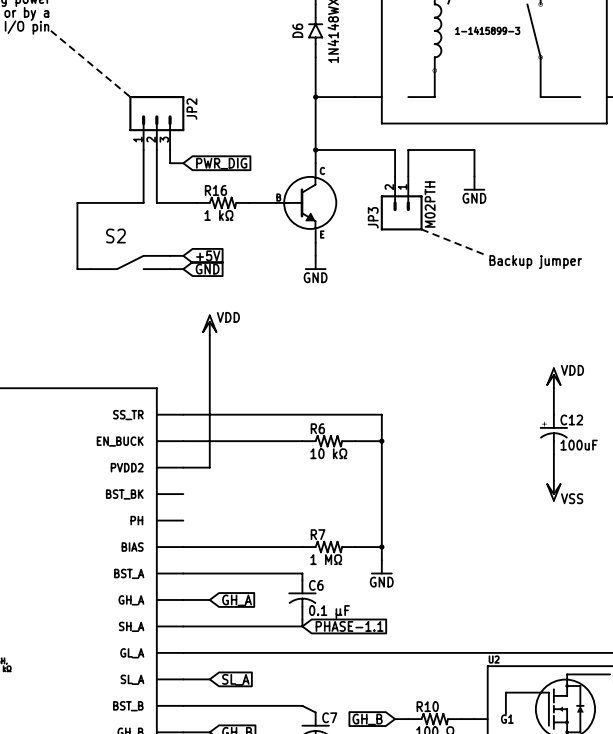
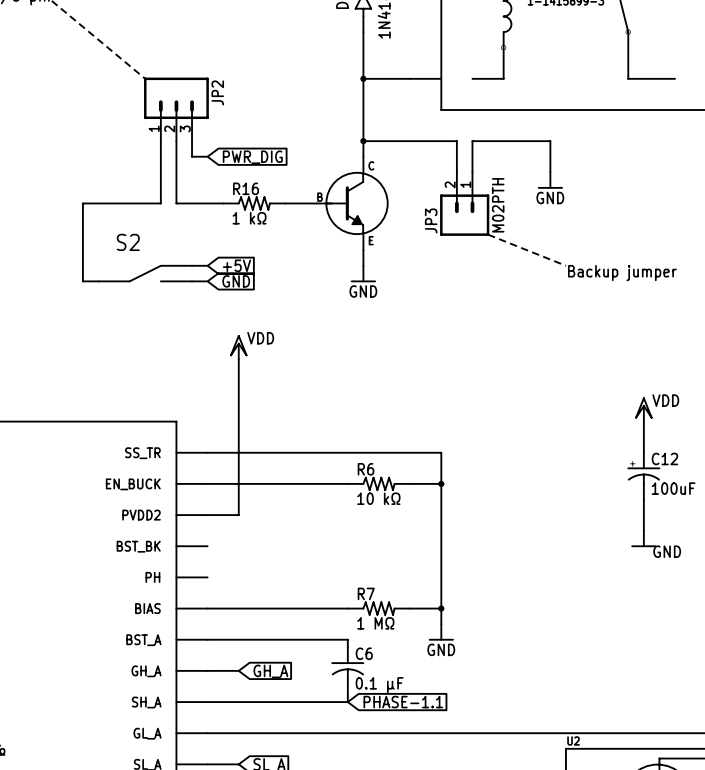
power symbol: VSS (553, 491) -> GND (643, 538)

